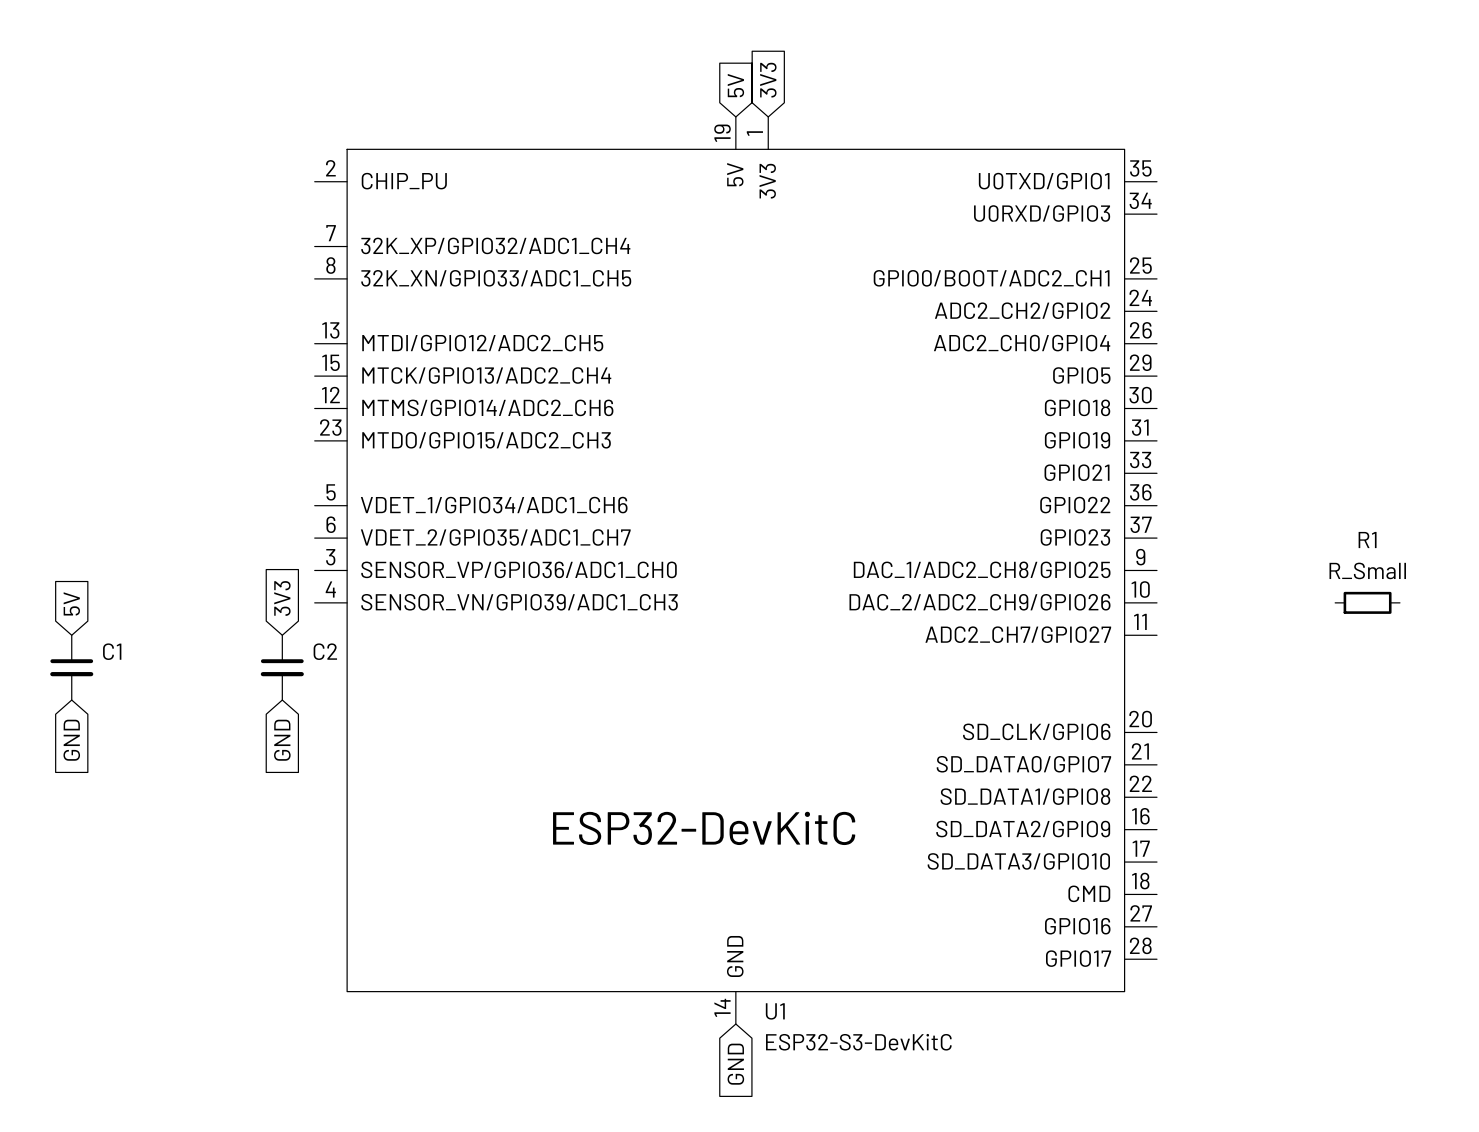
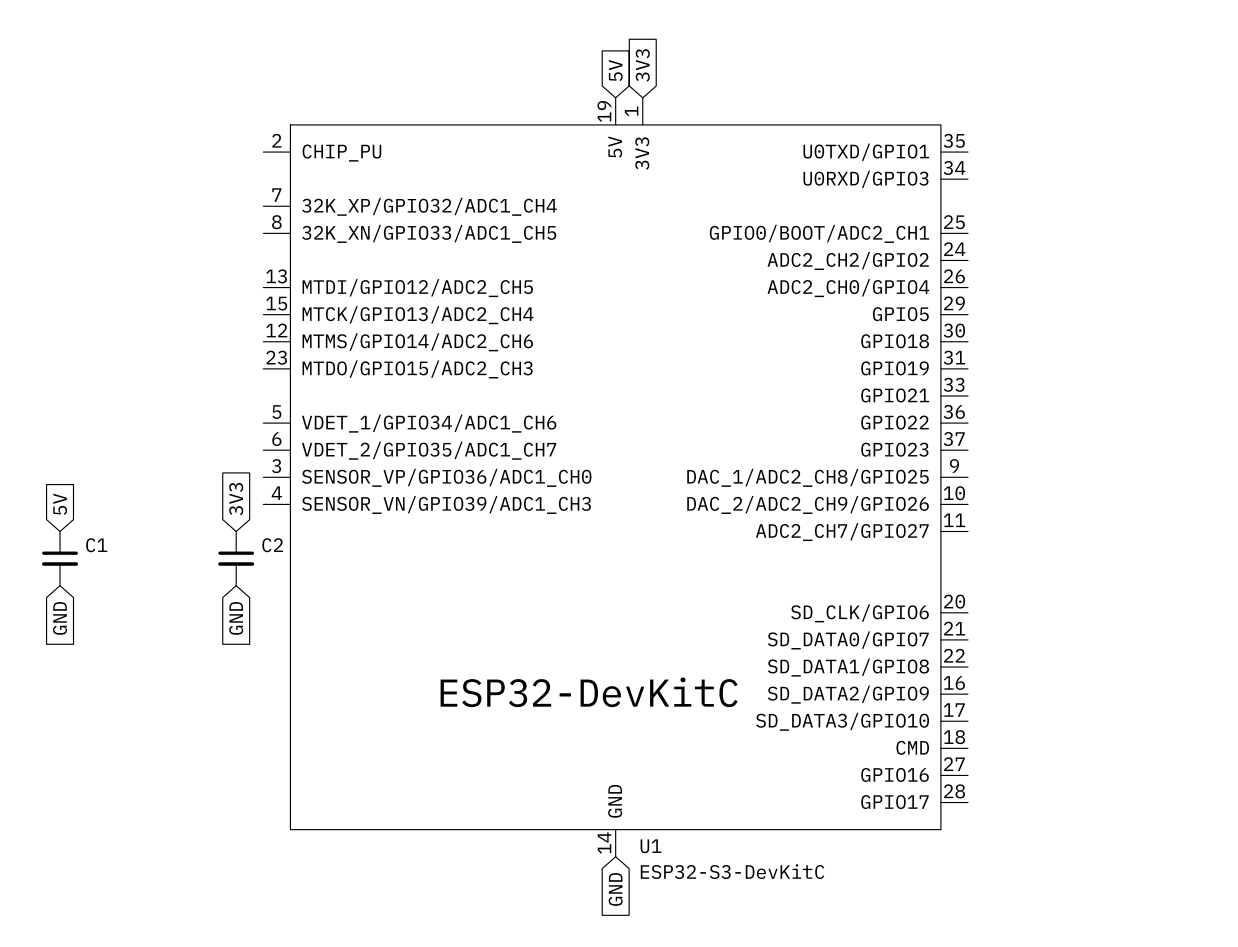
R1: R_Small (1367, 602) -> none

